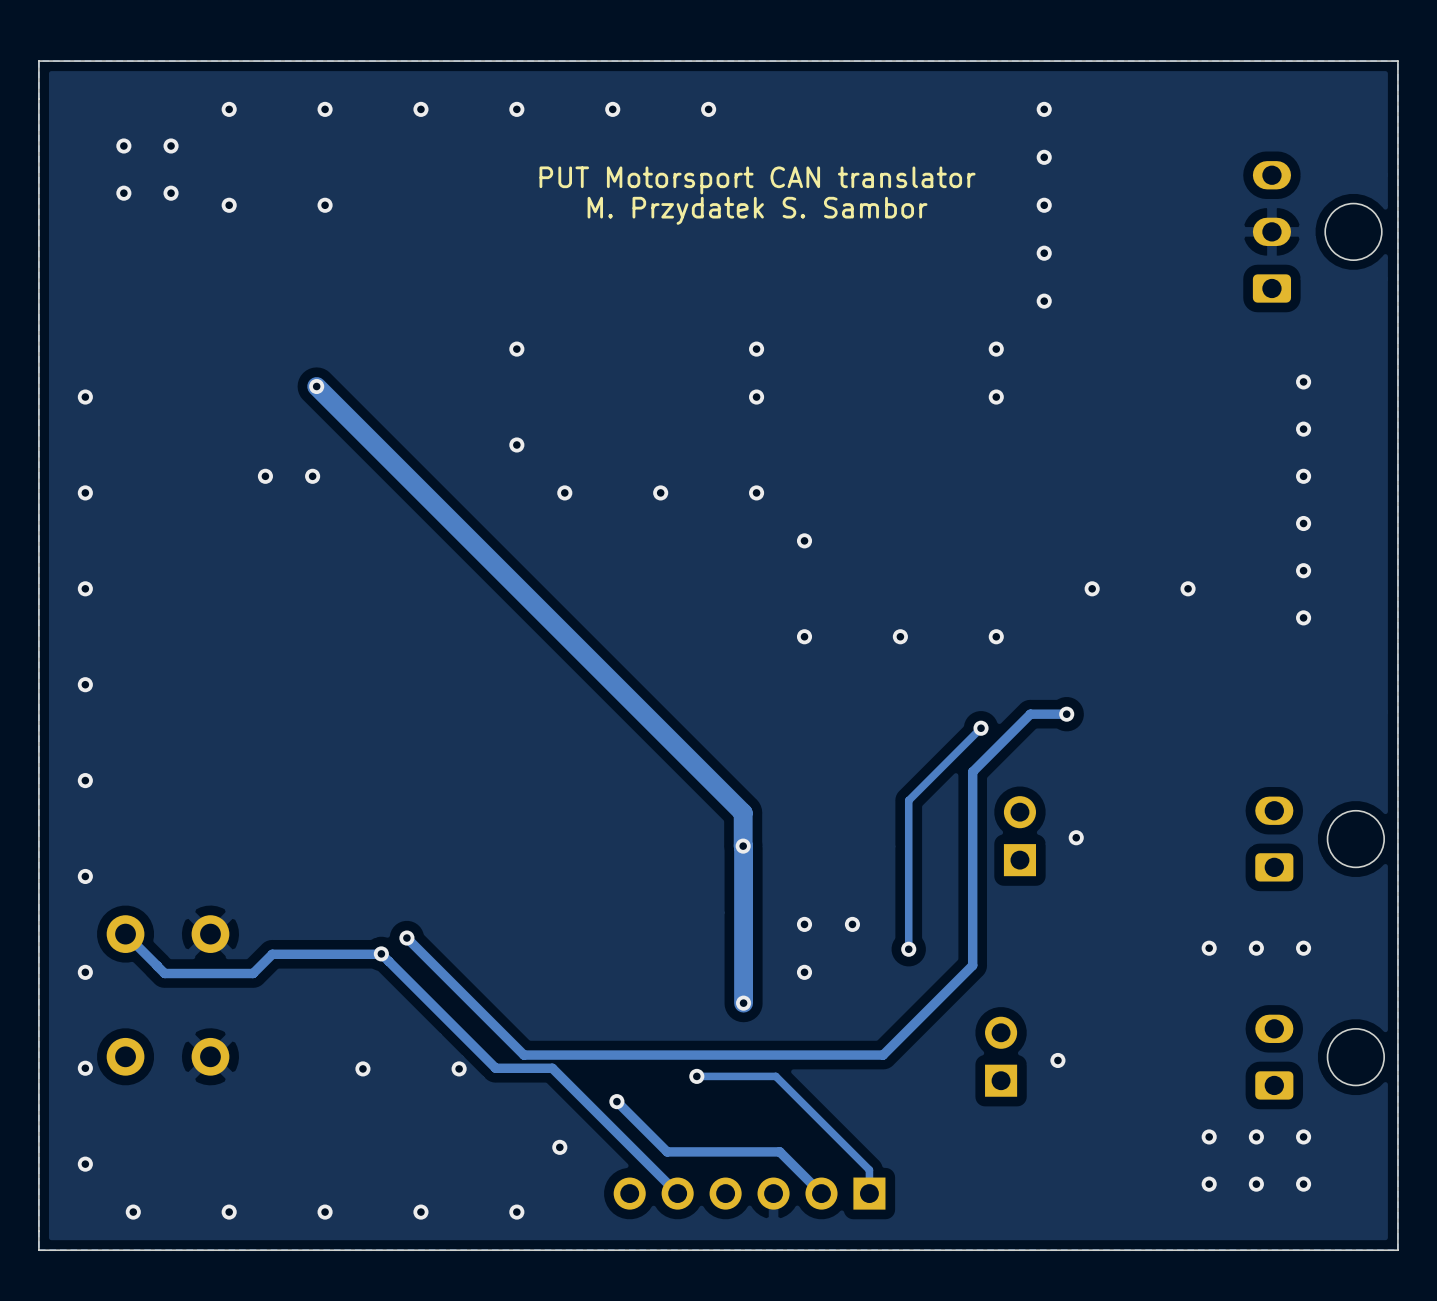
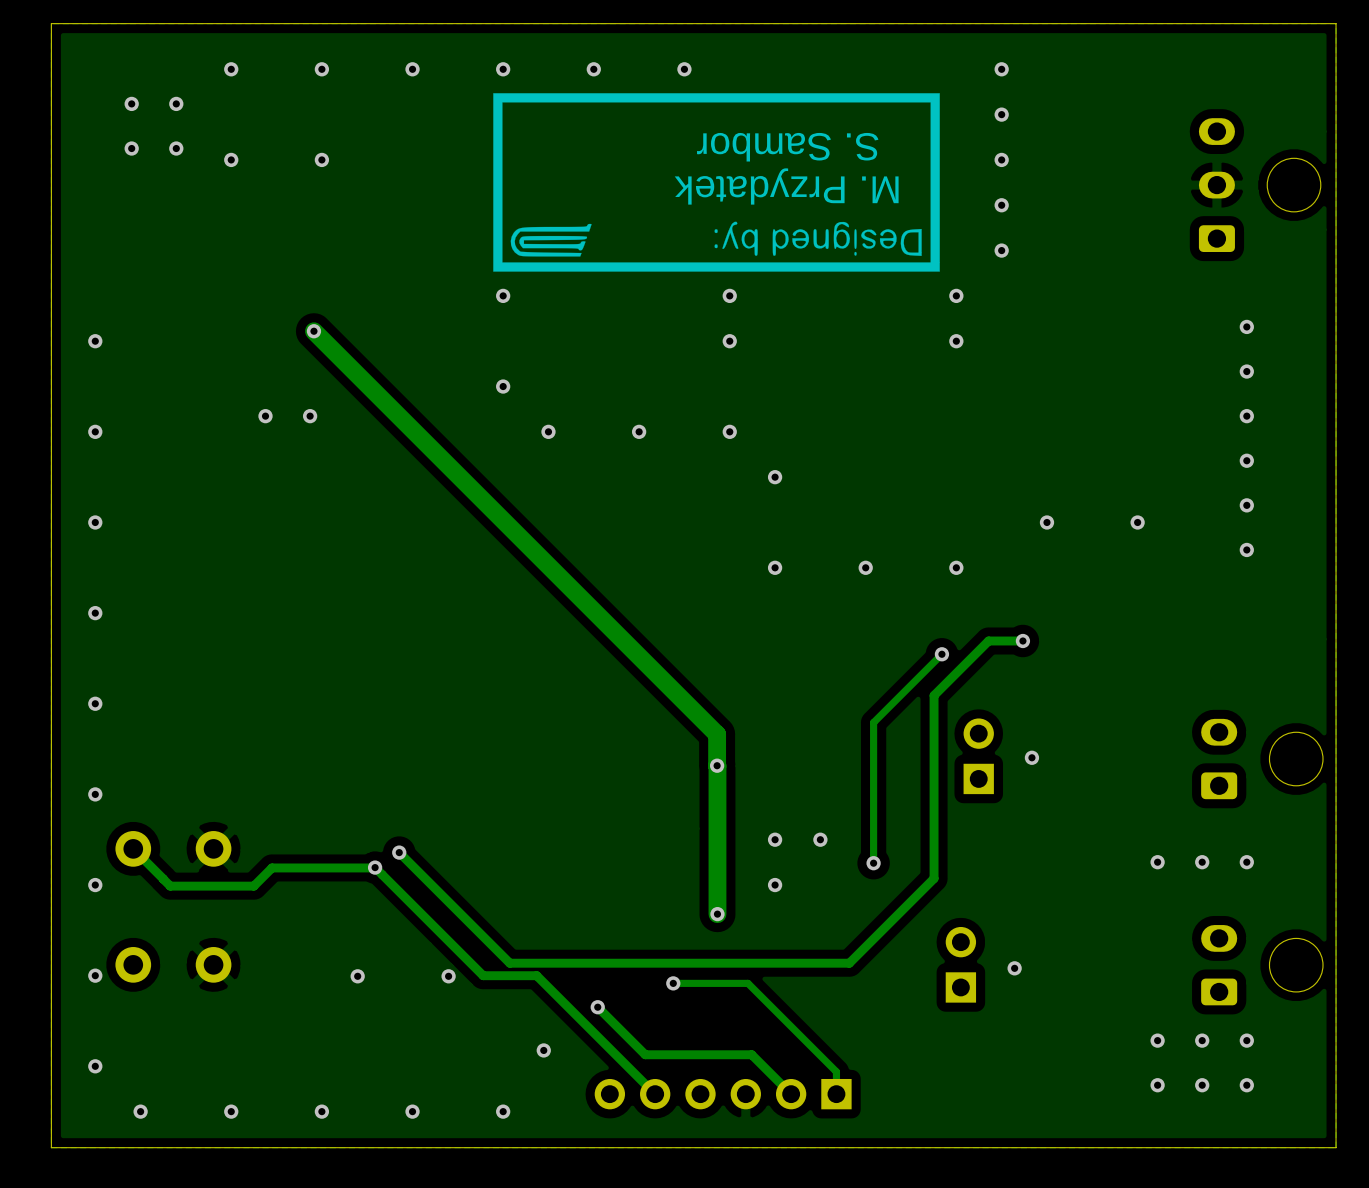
drawing: none -> [493, 93, 940, 272]
text: PUT Motorsport CAN translator (757, 180) -> none
text: none -> S. Sambor (787, 147)
text: M. Przydatek S. Sambor (757, 210) -> M. Przydatek (786, 186)

